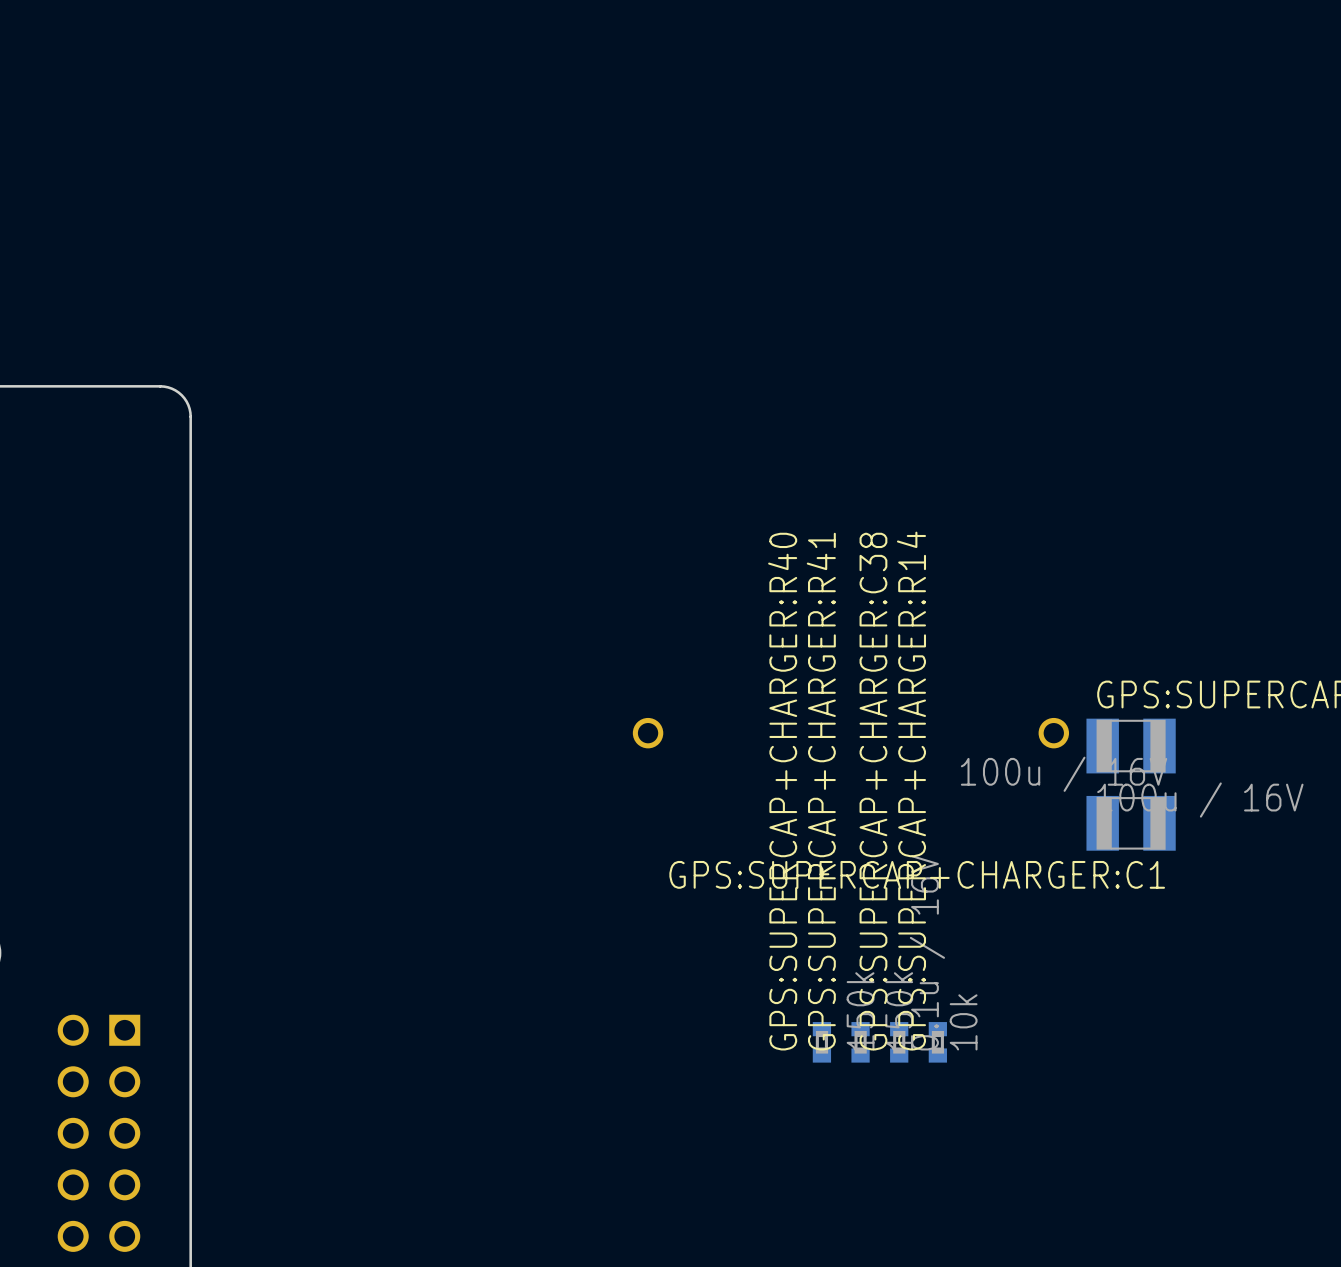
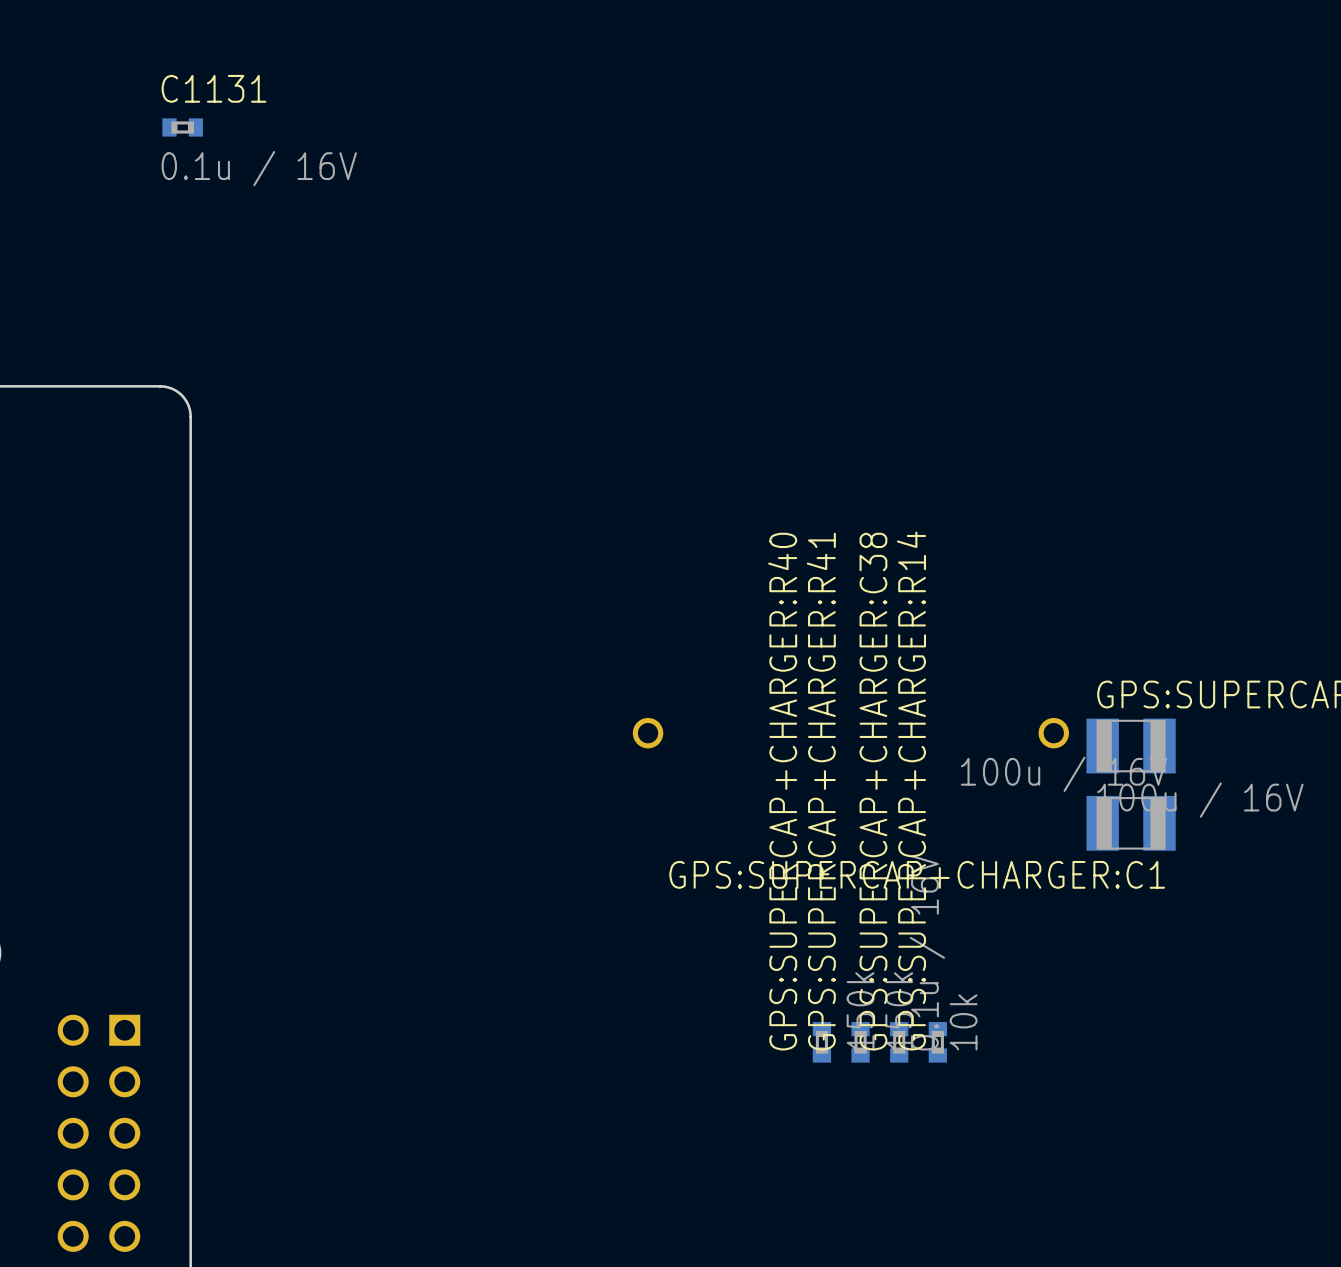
C1131: none -> 0.1u / 16V (182, 127)

